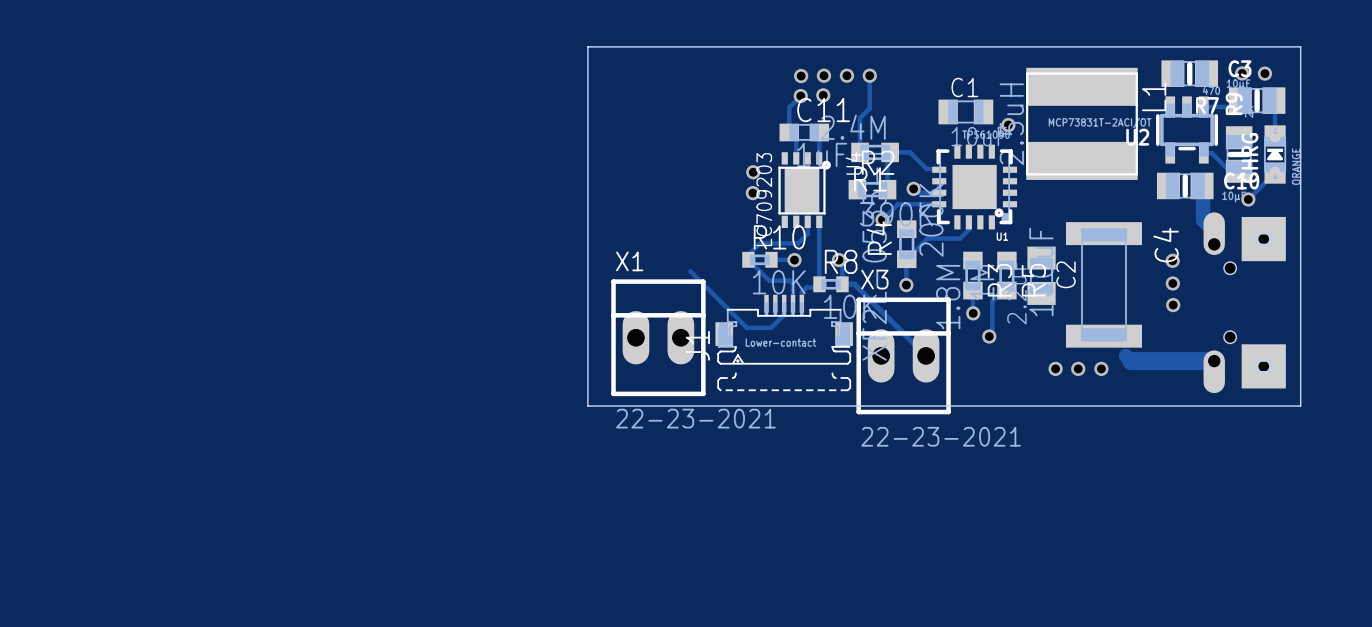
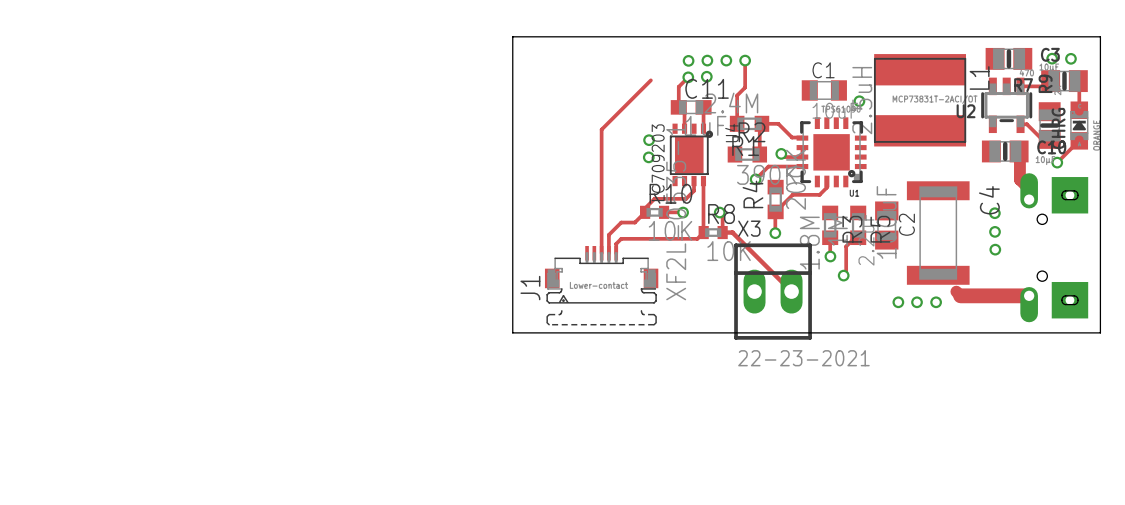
track: none -> (650, 80) (601, 129) (601, 253)
track: (748, 259) (769, 280) (789, 280) (793, 284) (793, 303) -> (645, 212) (634, 222) (621, 222) (608, 234) (608, 253)
track: (690, 271) (746, 327) (771, 327) (784, 314) (784, 303) -> none
track: (816, 287) (806, 287) (801, 292) (801, 303) -> (701, 235) (697, 238) (621, 238) (616, 243) (616, 253)
X1: 22-23-2021 (658, 337) -> none
J1 position: (784, 342) -> (601, 285)

